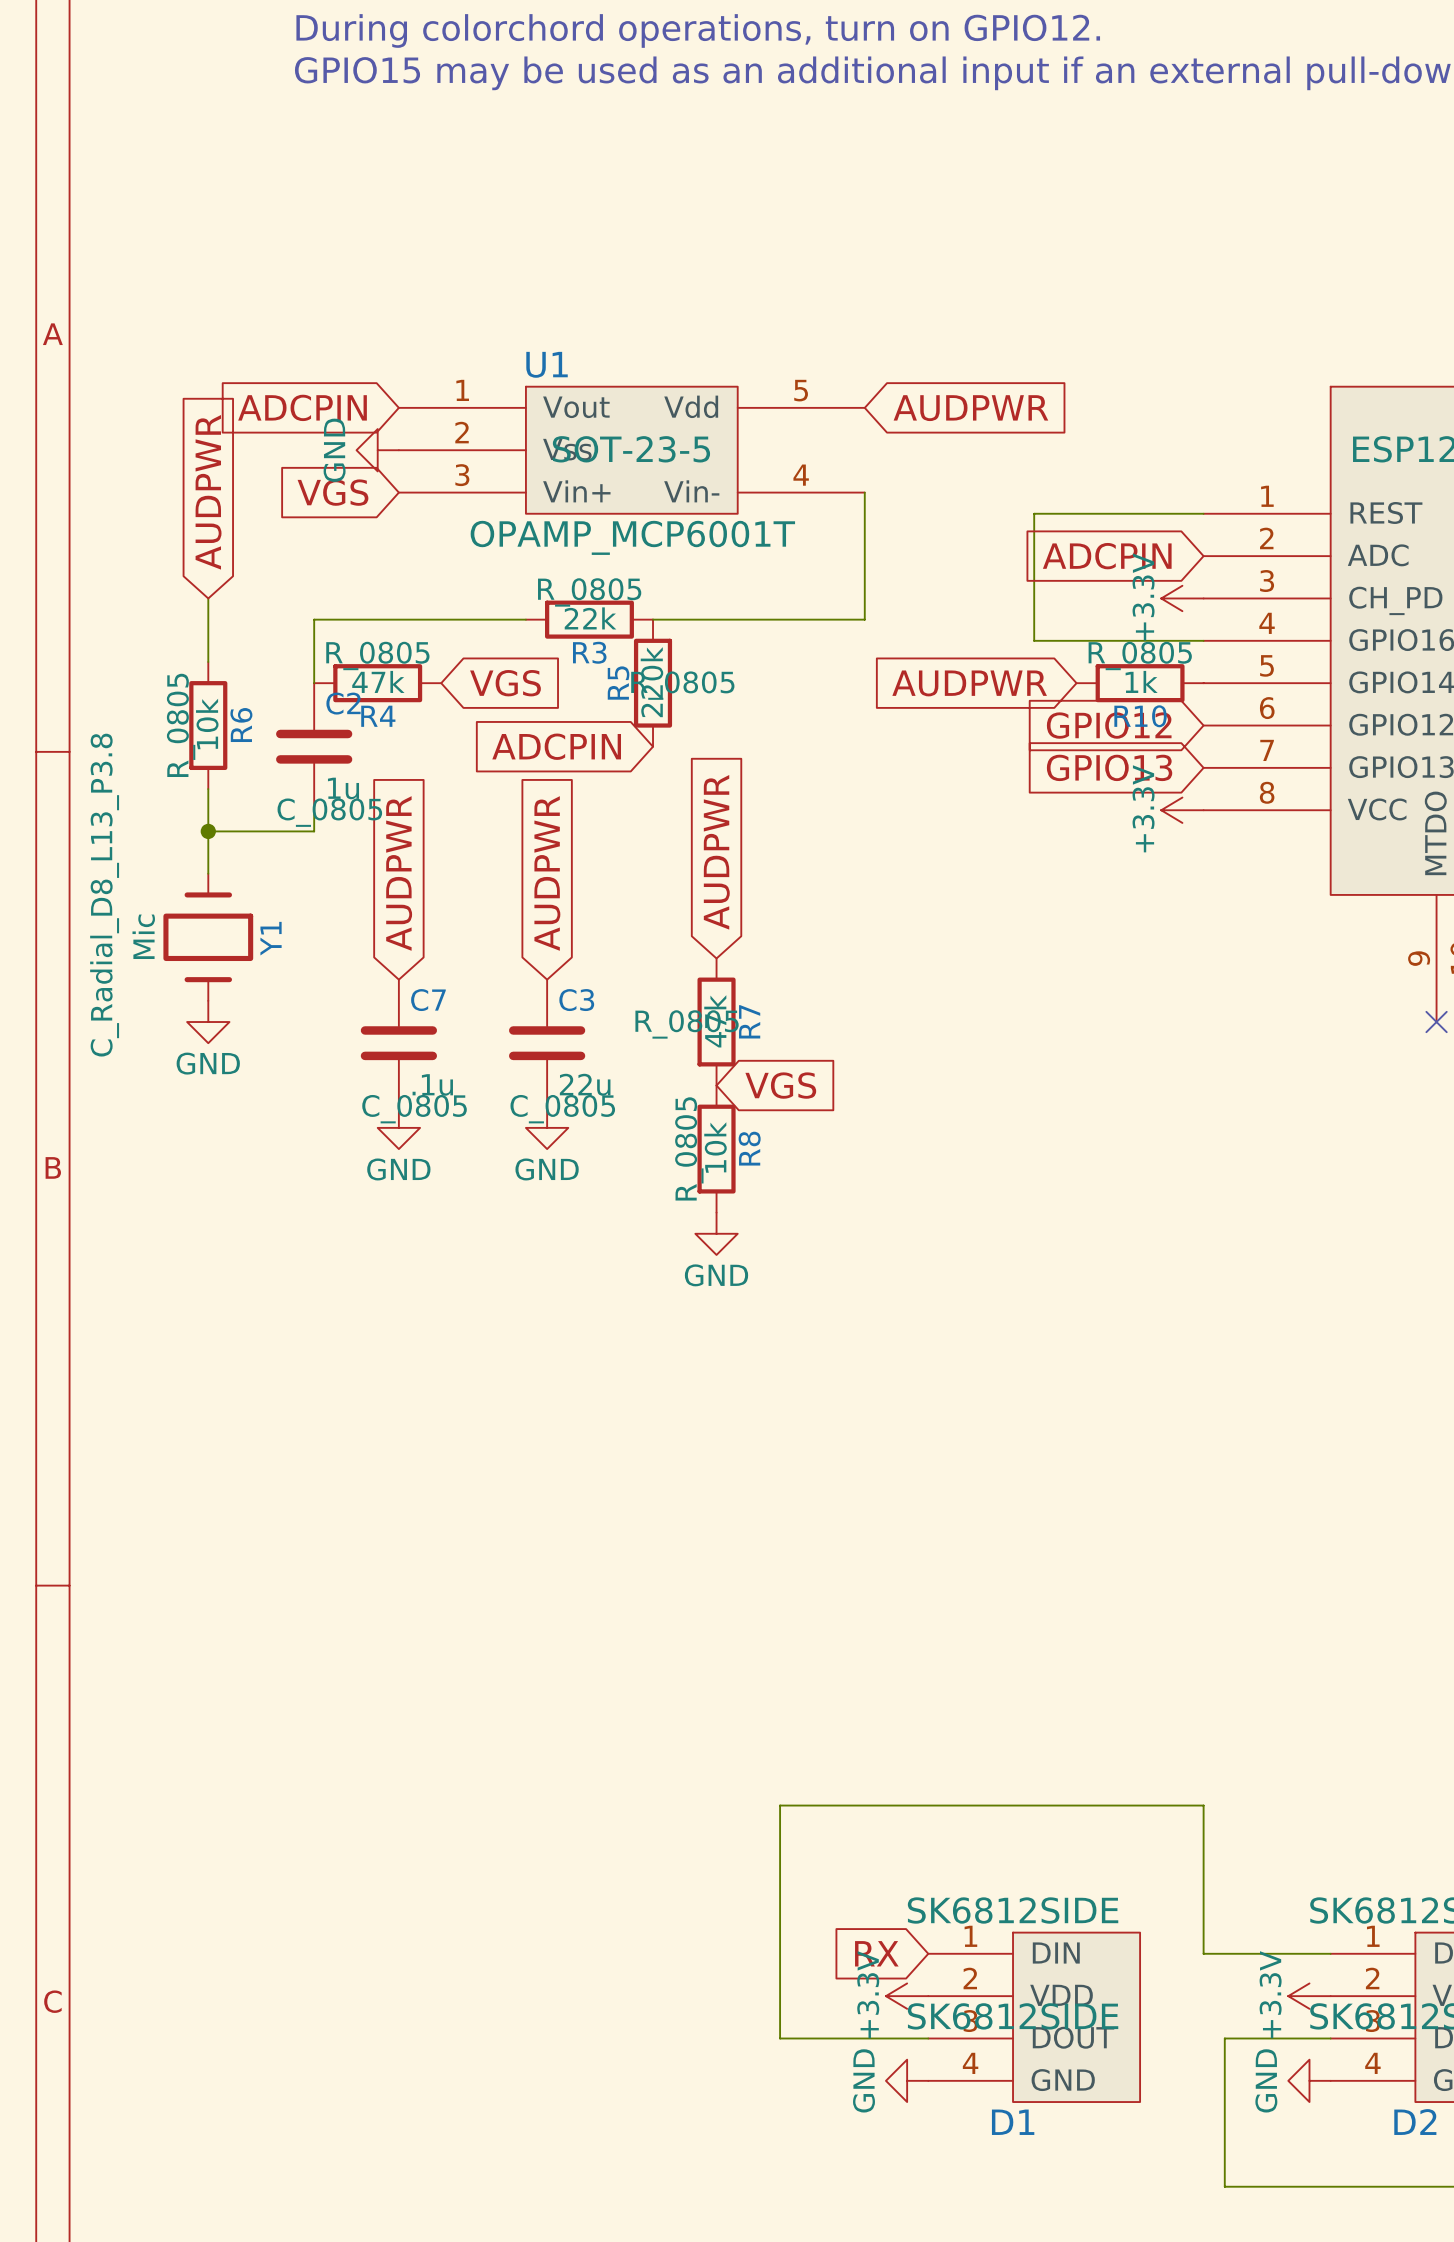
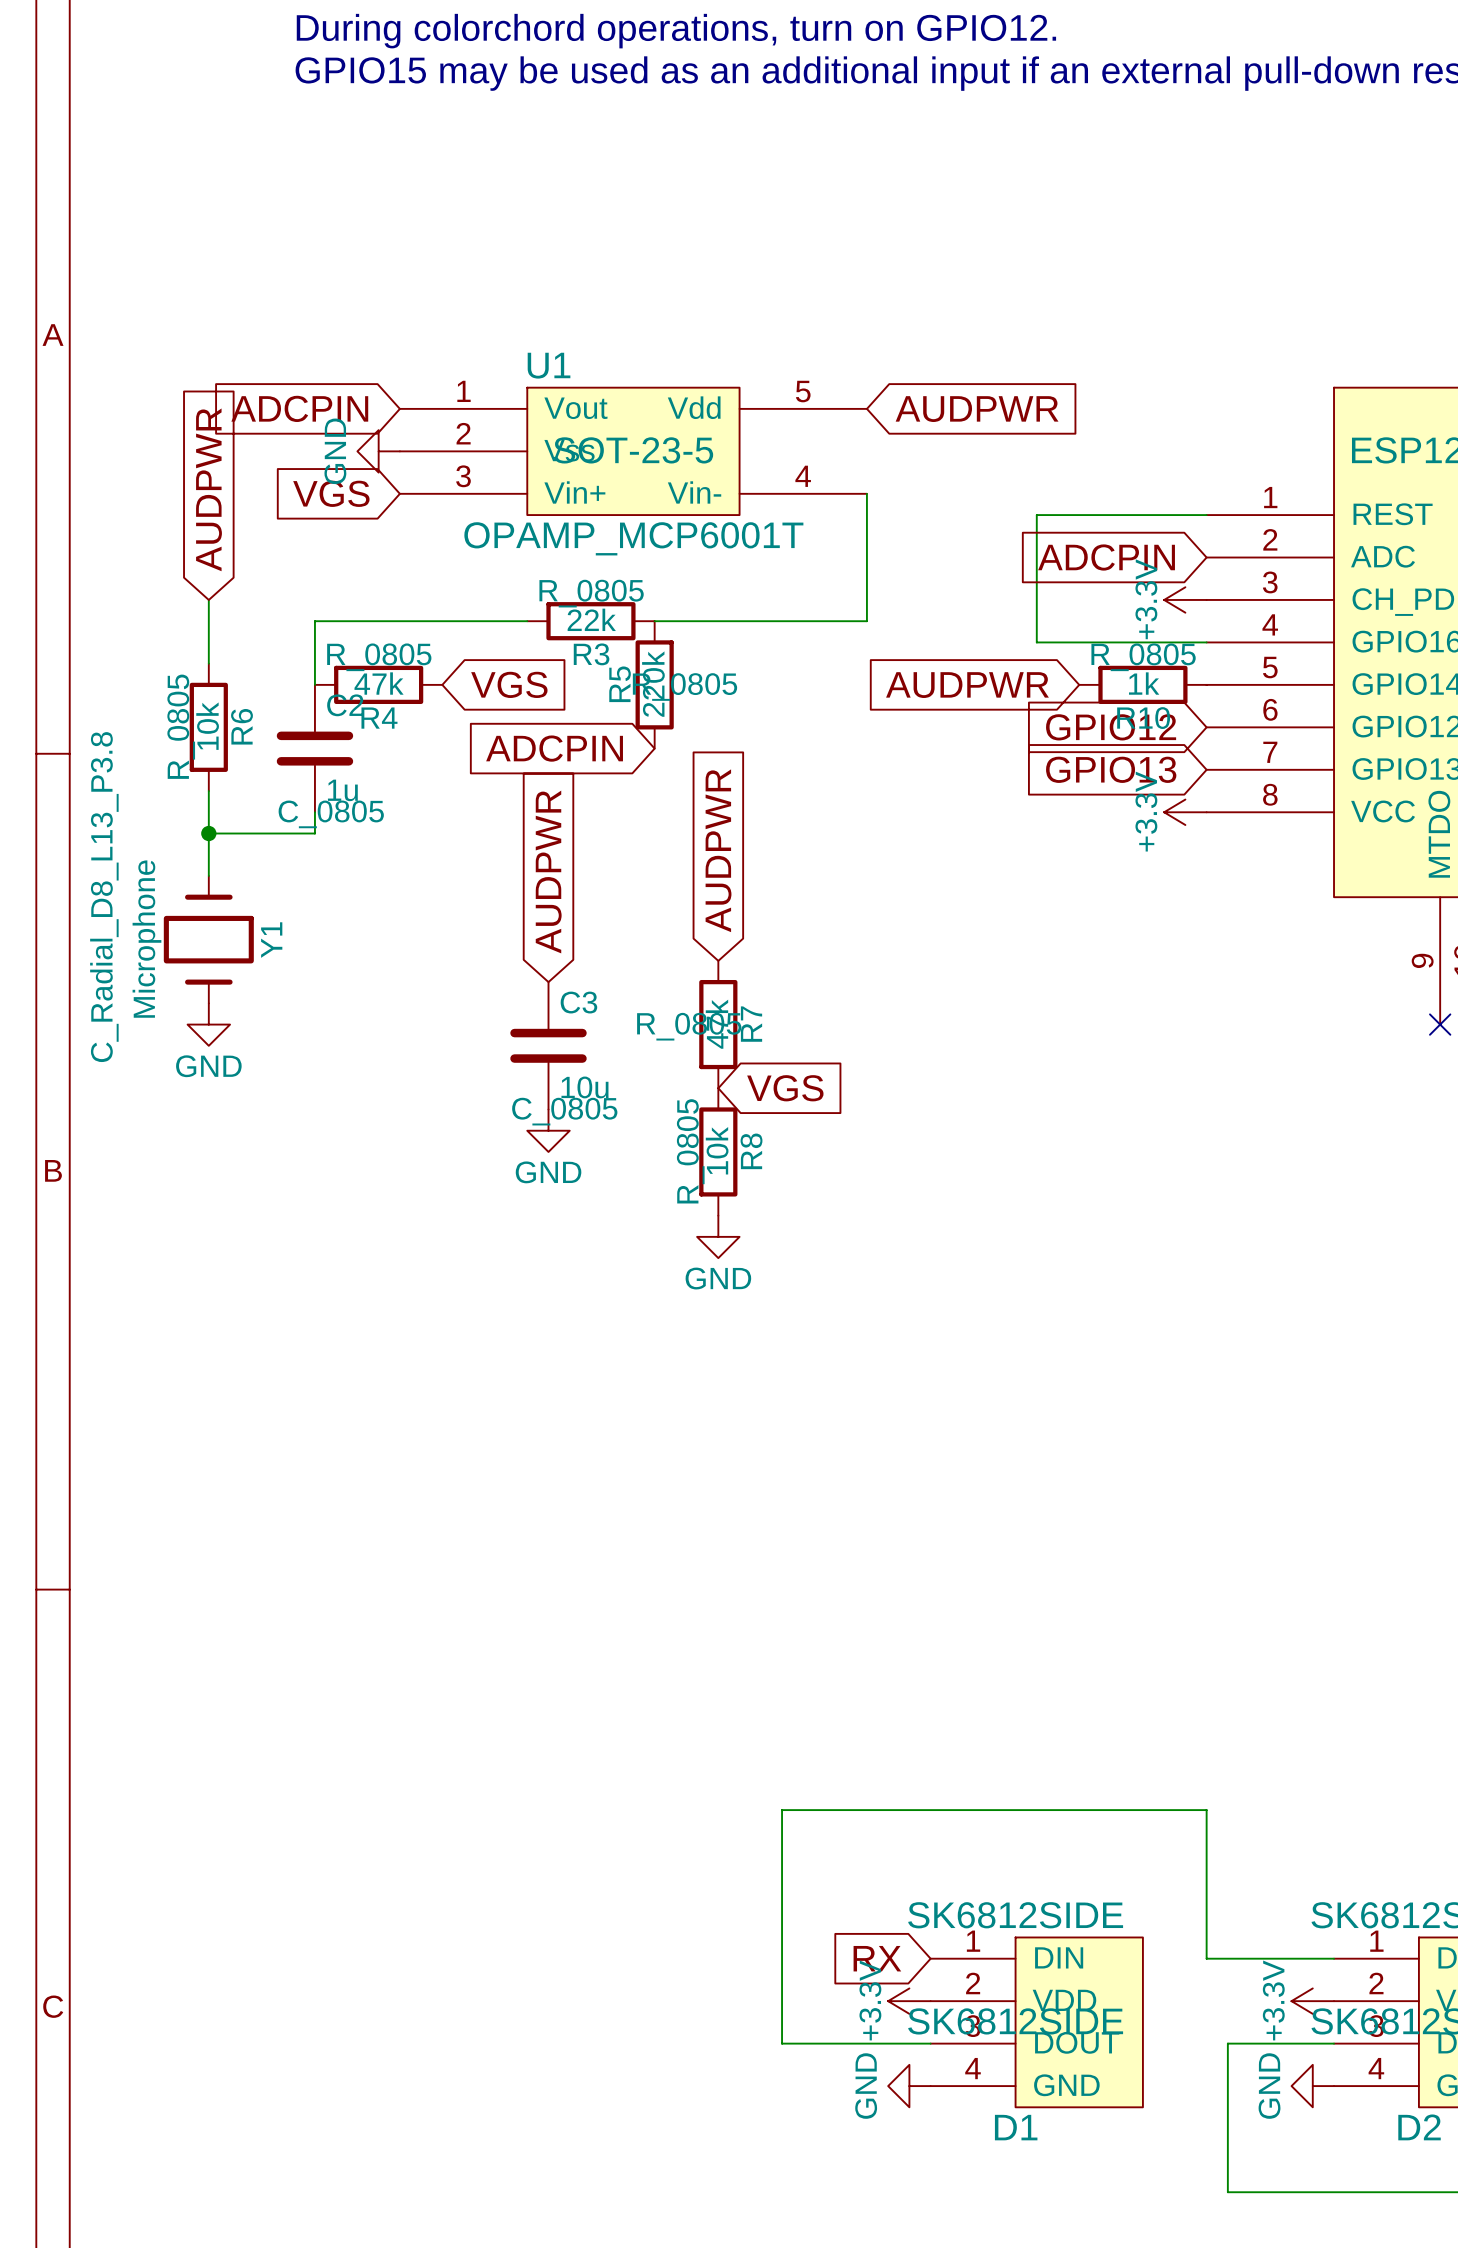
global label: AUDPWR (399, 873) -> none
Y1 value: Mic (143, 936) -> Microphone (146, 939)
C7: .1u (398, 1043) -> none
C3 value: 22u (585, 1084) -> 10u (585, 1087)
power symbol: GND (398, 1127) -> none

